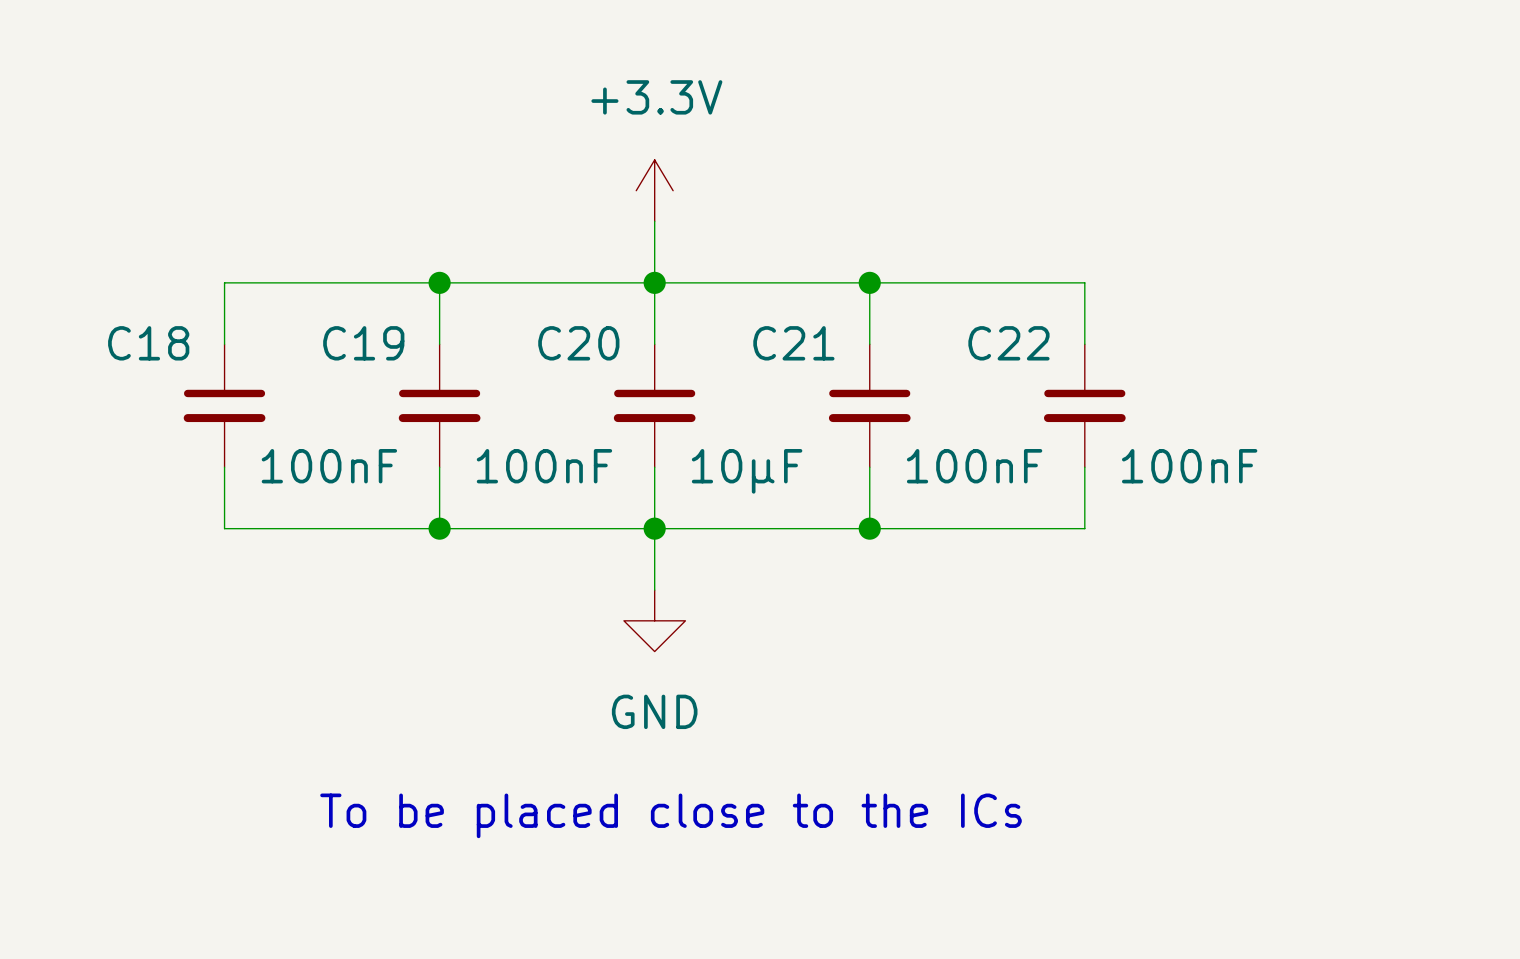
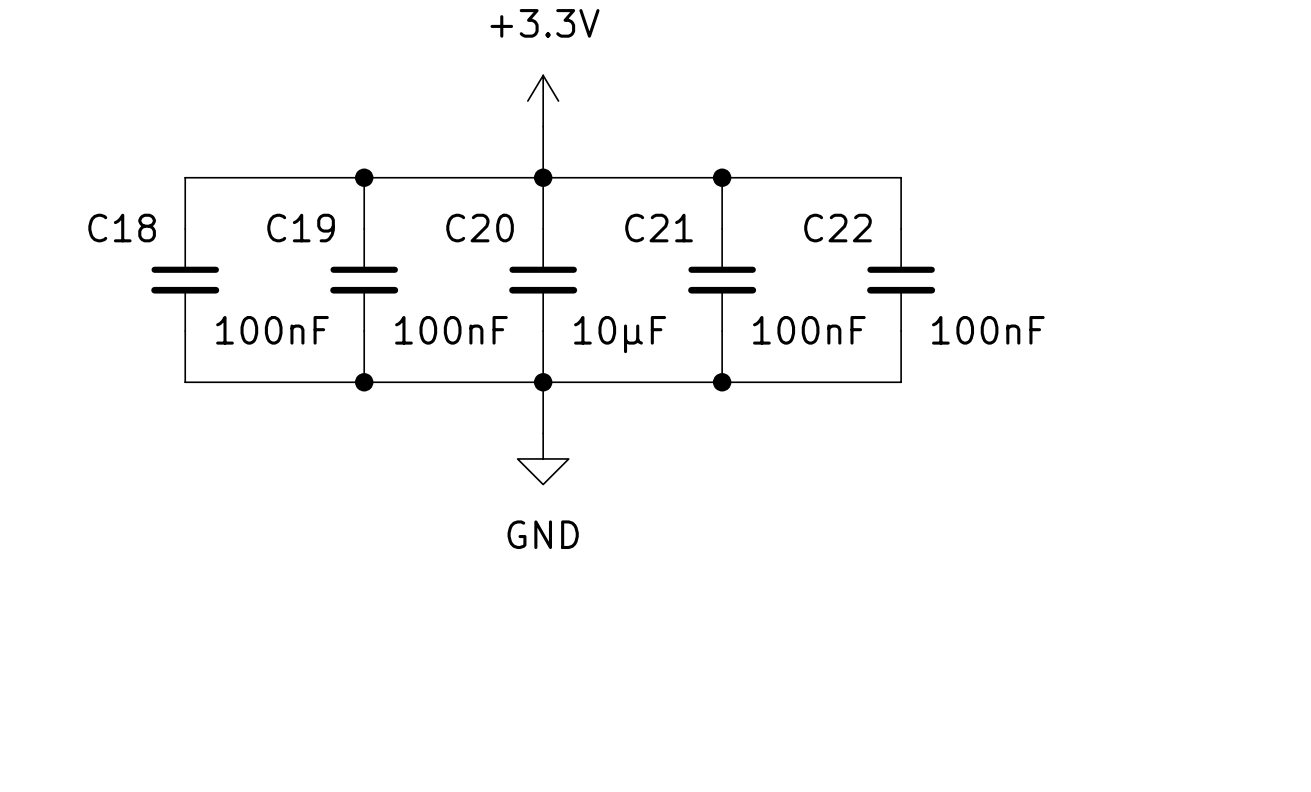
text: To be placed close to the ICs (671, 815) -> none

